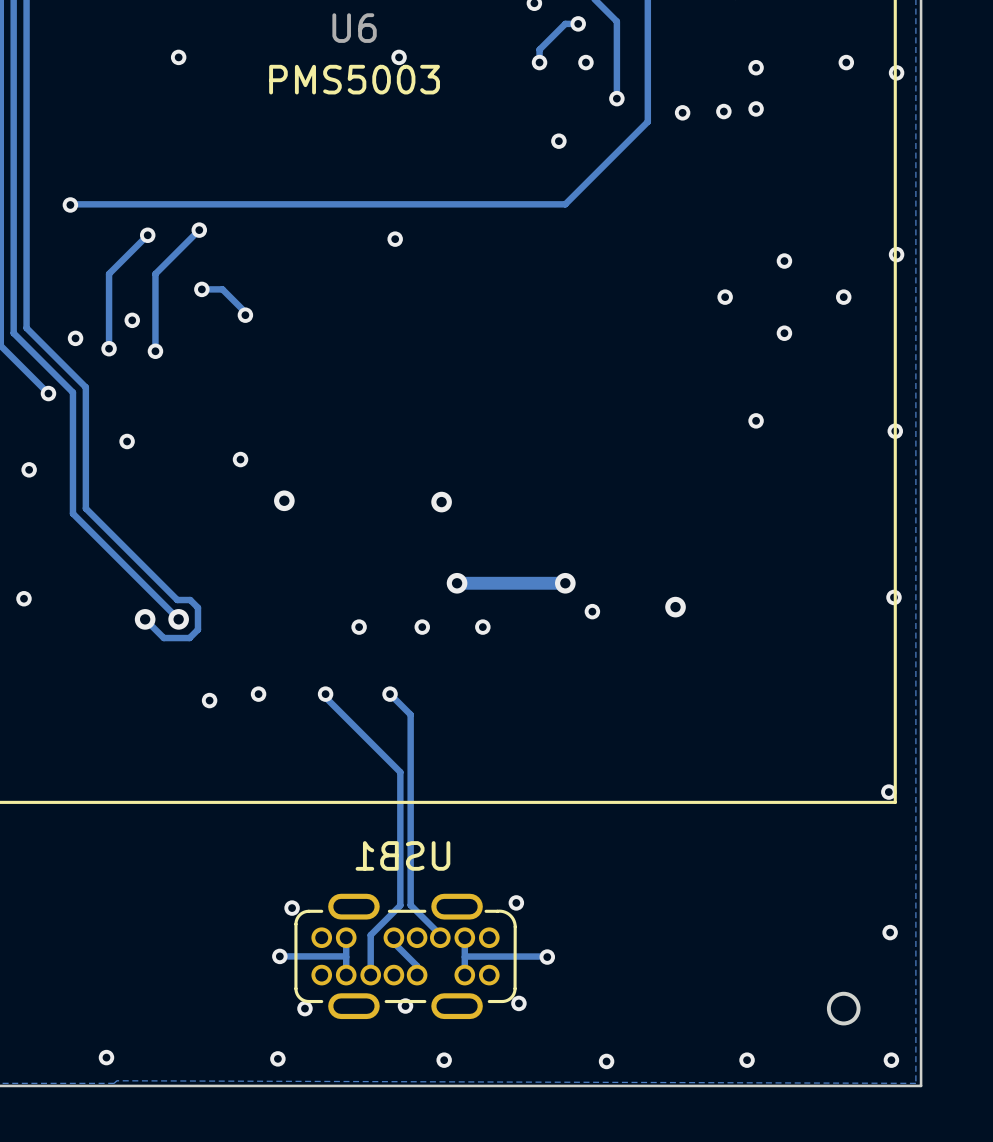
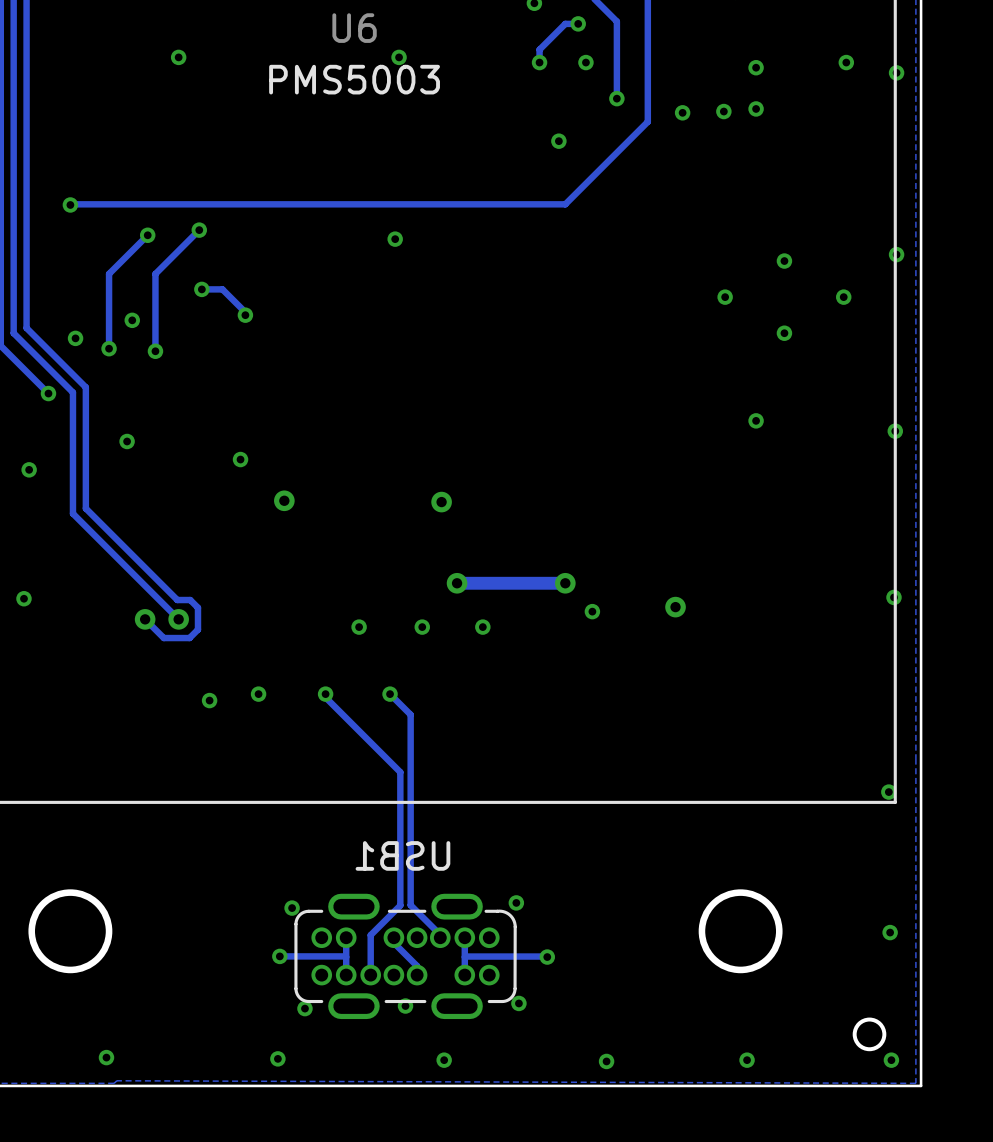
round board edge: none -> [28, 889, 113, 974]
round board edge: none -> [698, 889, 783, 974]
round board edge position: (843, 1008) -> (869, 1034)

